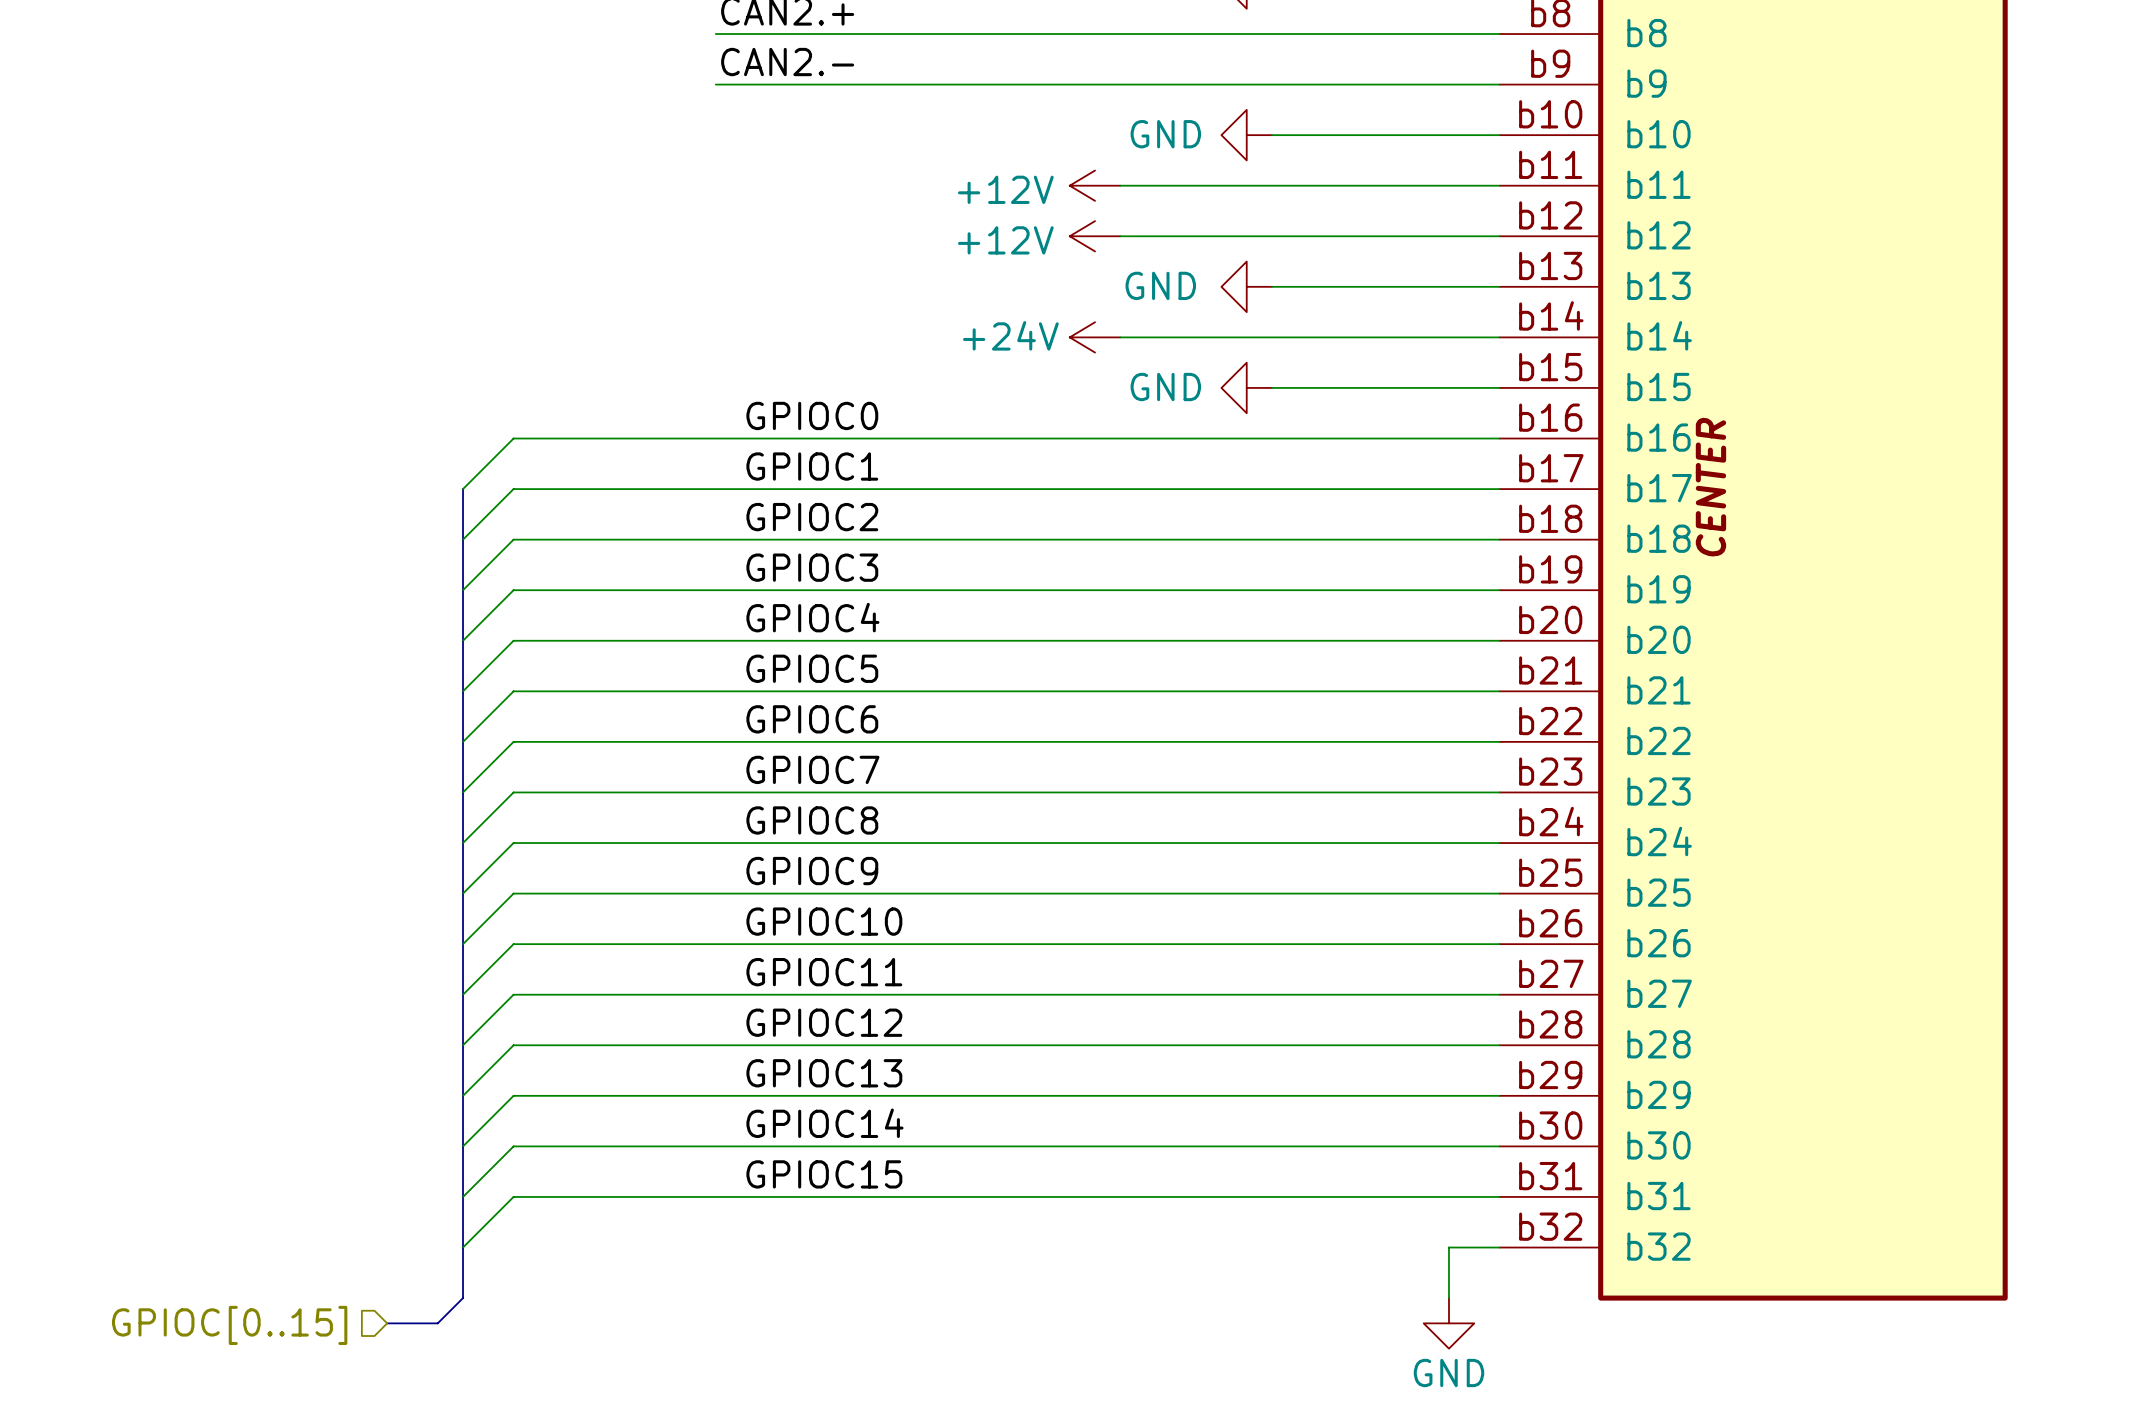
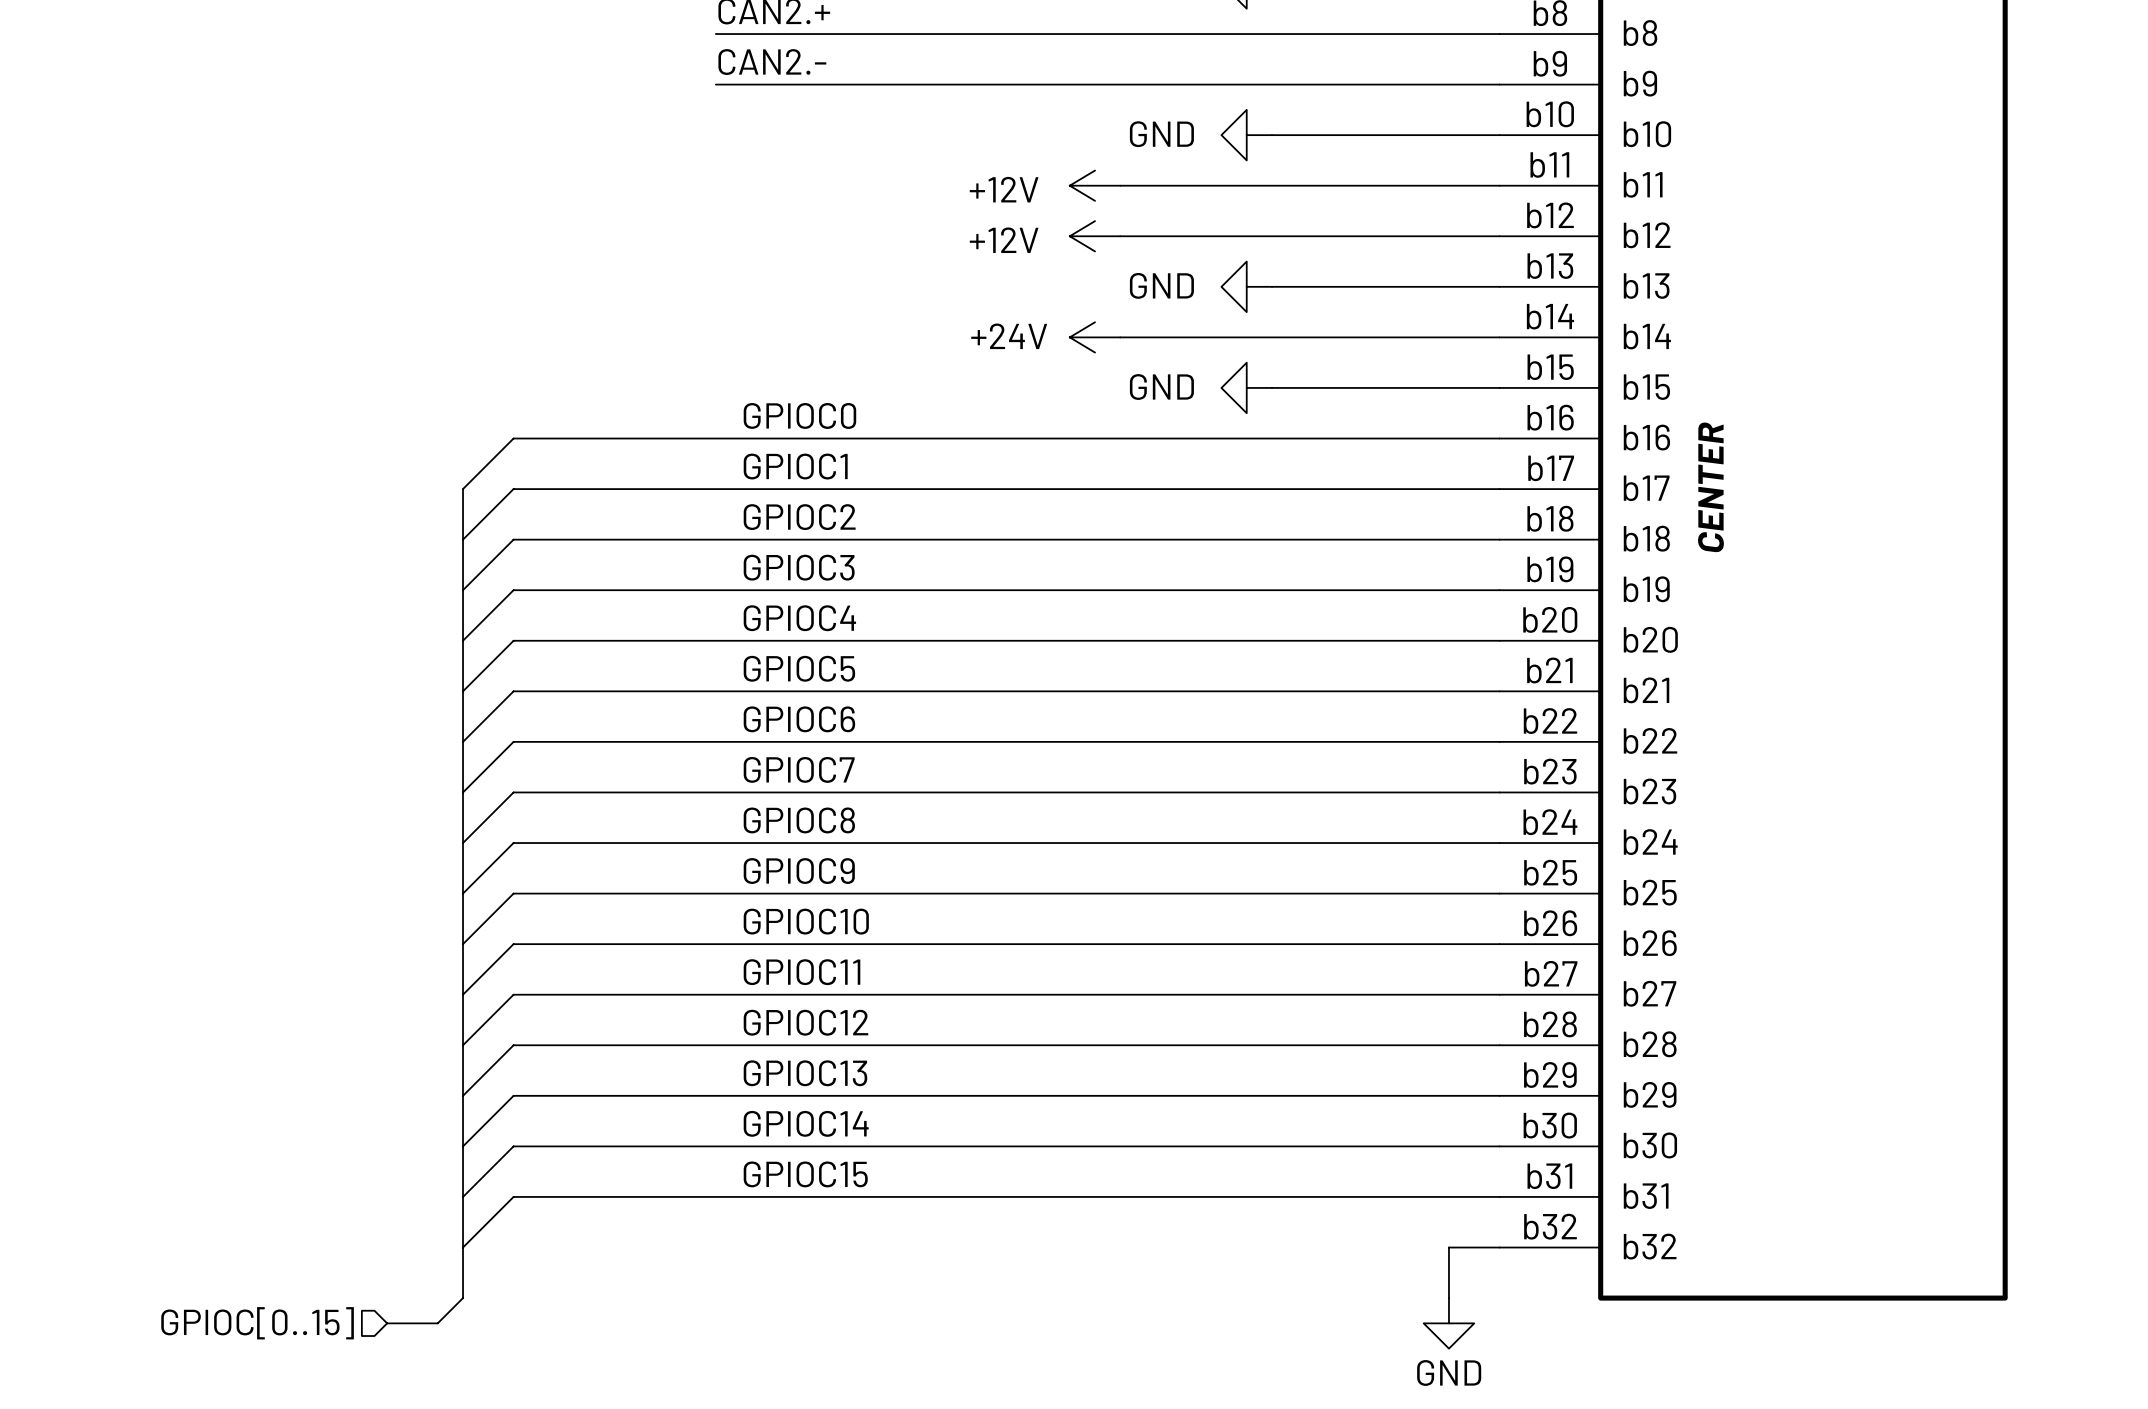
power symbol text position: GND (1165, 134) -> GND (1161, 134)
power symbol text position: GND (1160, 285) -> GND (1161, 285)
power symbol text position: GND (1165, 387) -> GND (1161, 387)

